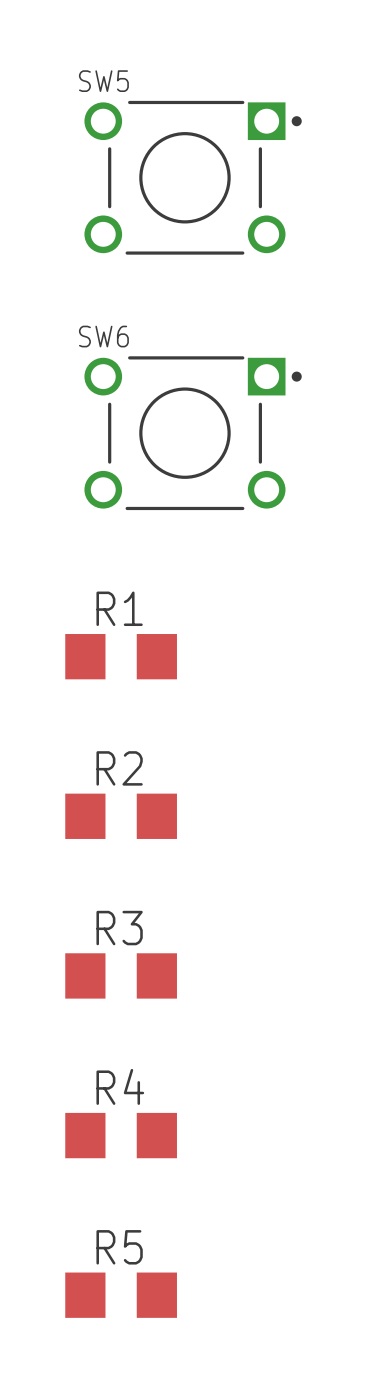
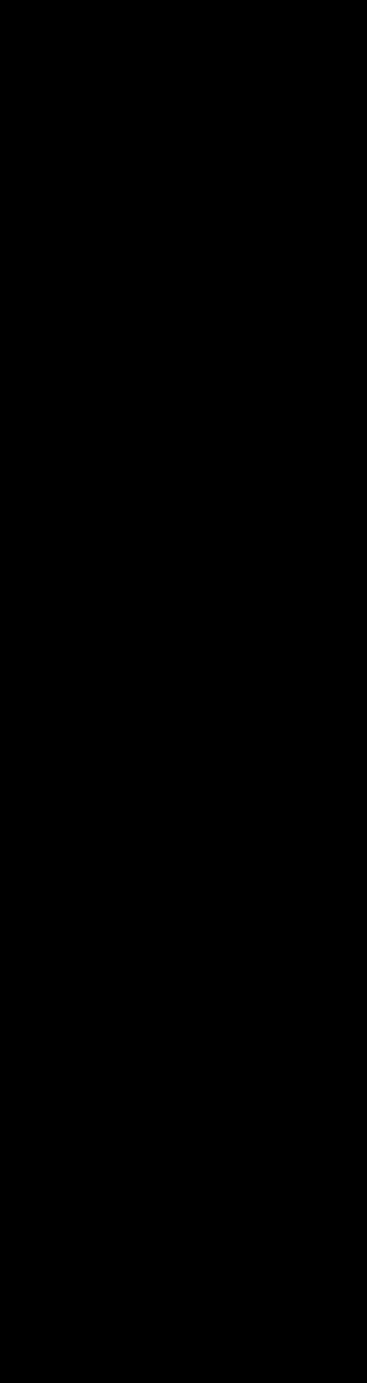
SW5: (193, 177) -> none
SW6: (193, 433) -> none
R1: (121, 656) -> none
R2: (121, 816) -> none
R3: (121, 975) -> none
R4: (121, 1135) -> none
R5: (121, 1295) -> none

